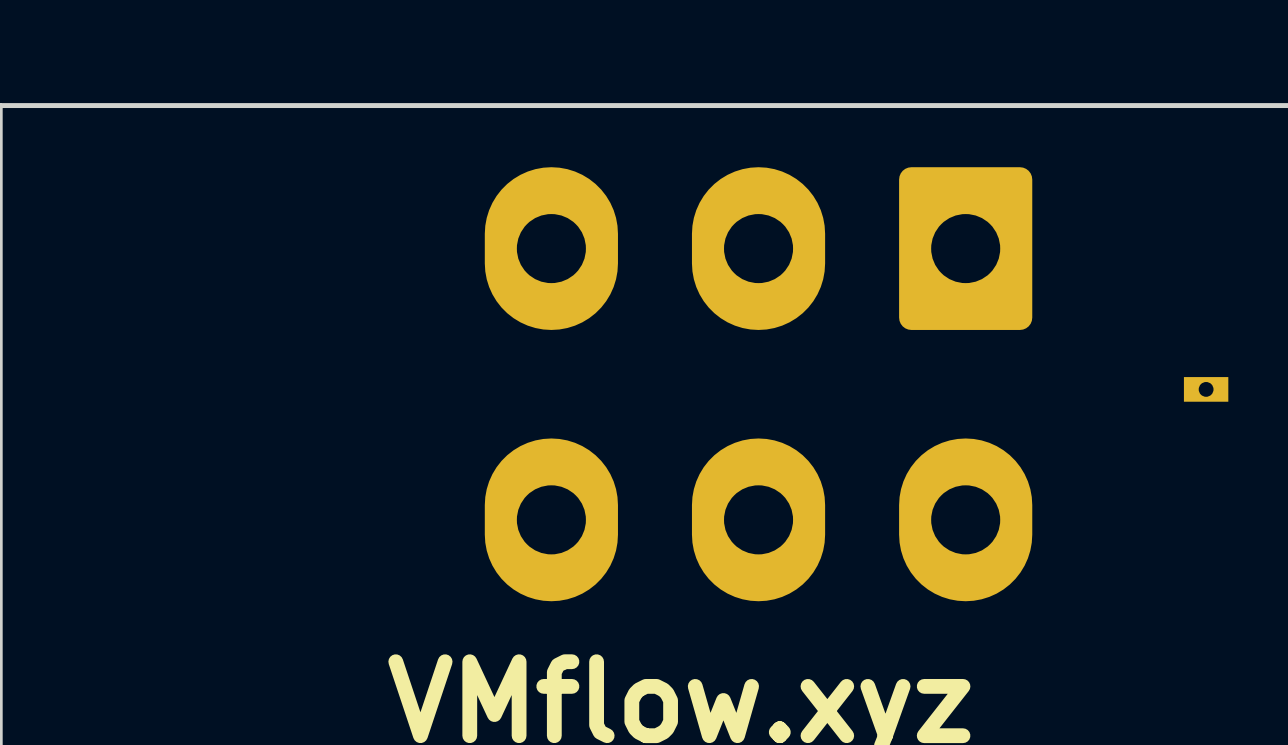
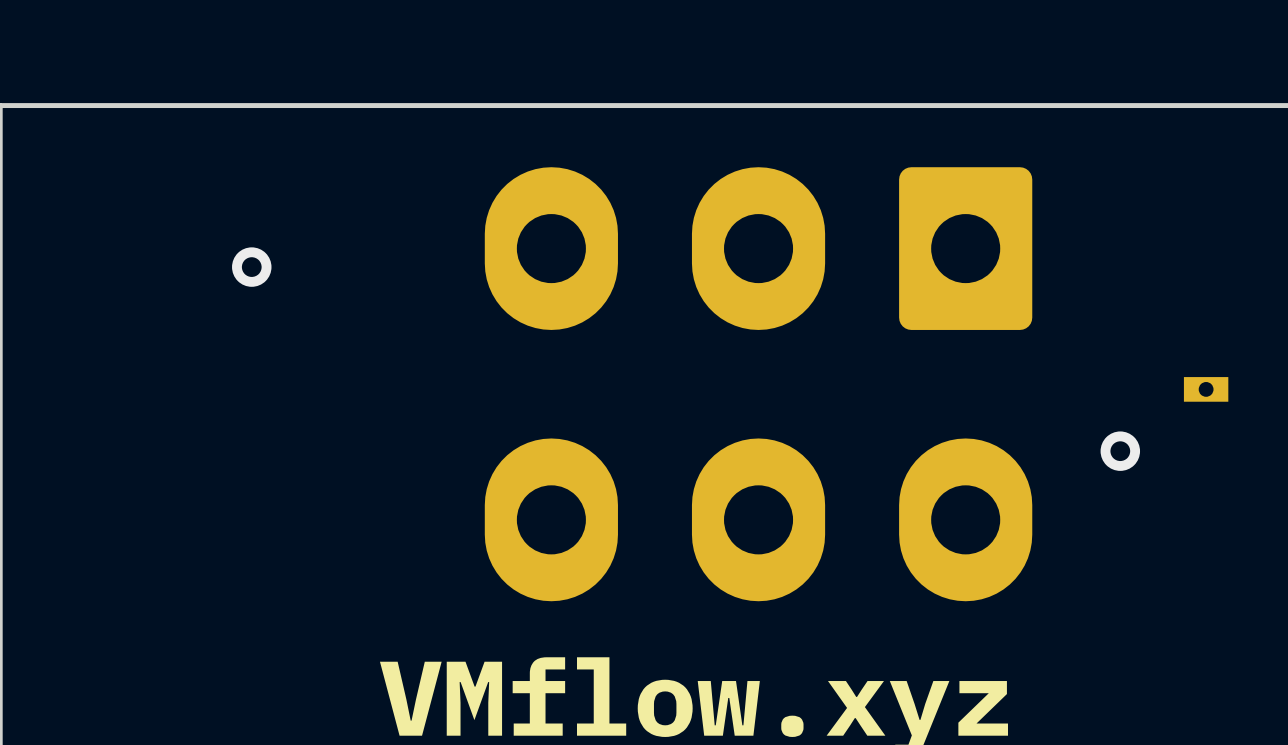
via: none -> (251, 267)
via: none -> (1120, 451)

